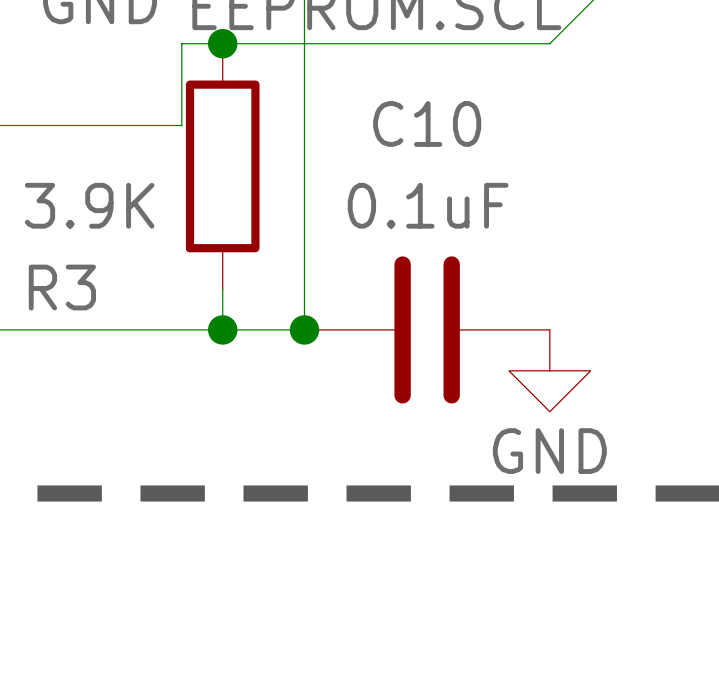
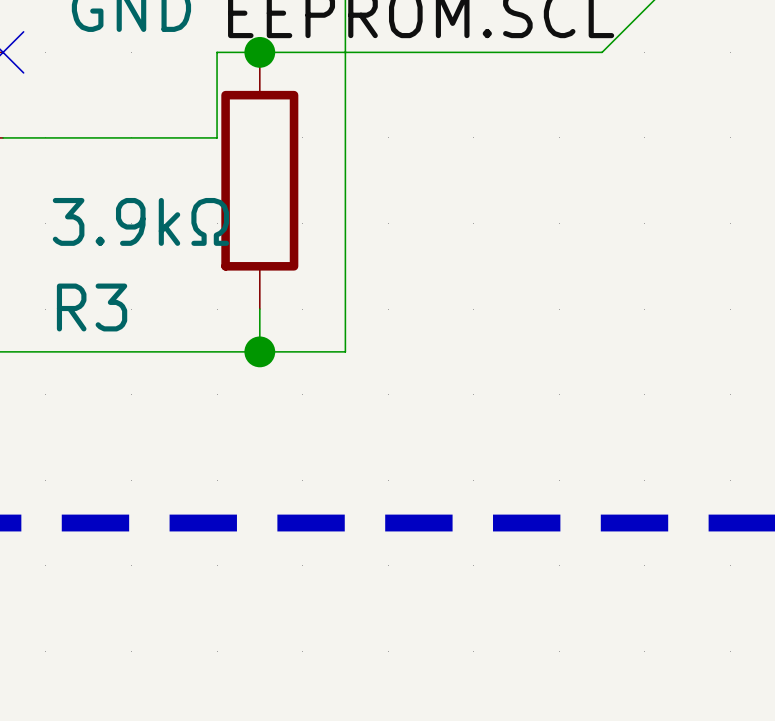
R3 value: 3.9K (89, 205) -> 3.9kΩ (140, 221)
junction: (304, 329) -> none
C10: 0.1uF (427, 329) -> none
power symbol: GND (549, 370) -> none

